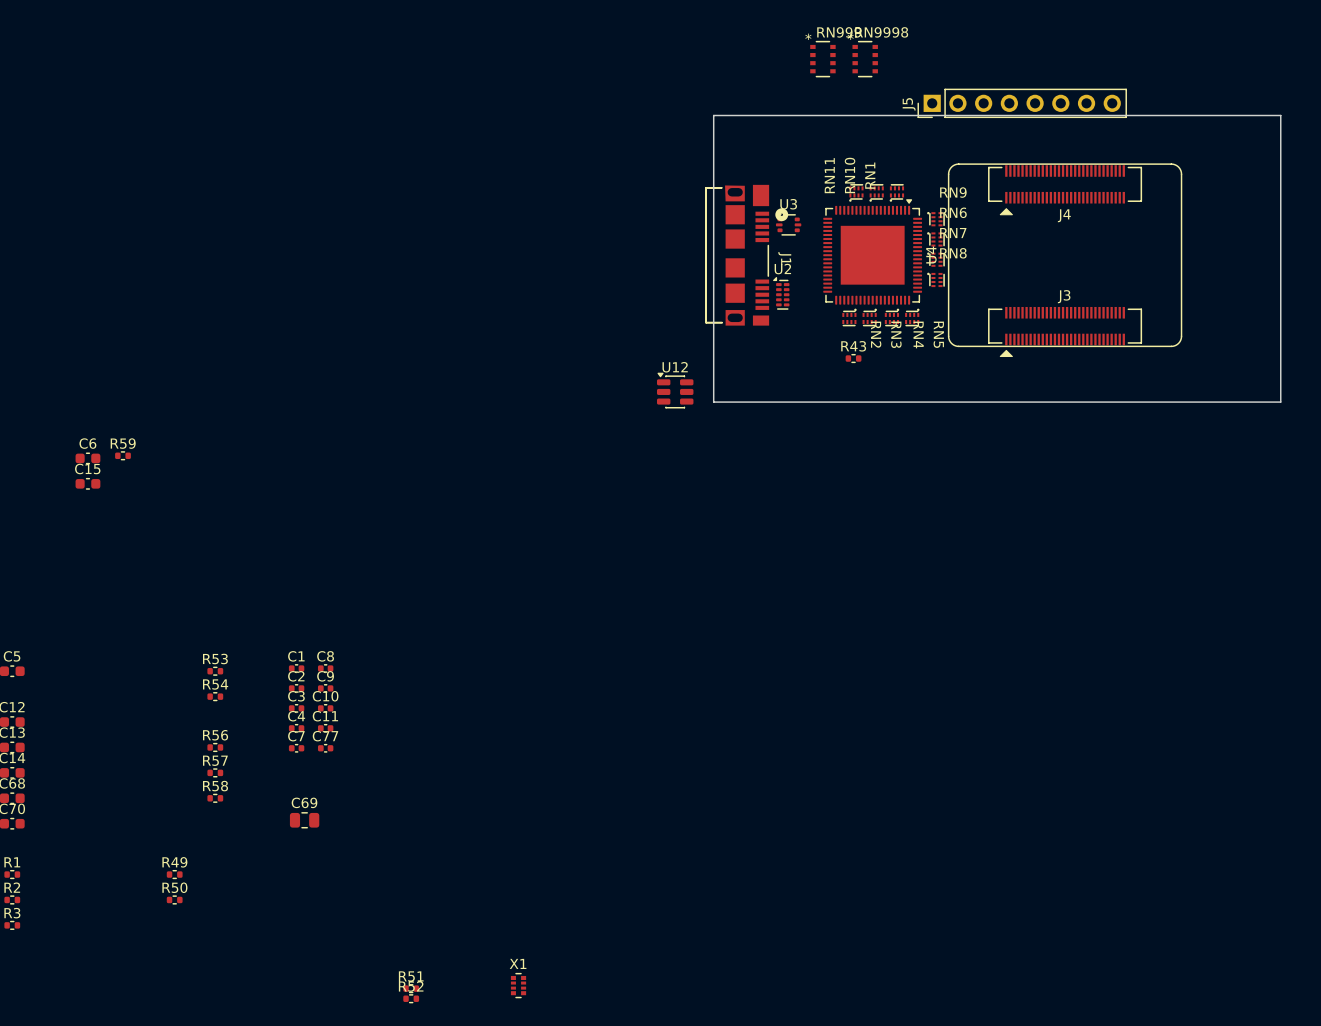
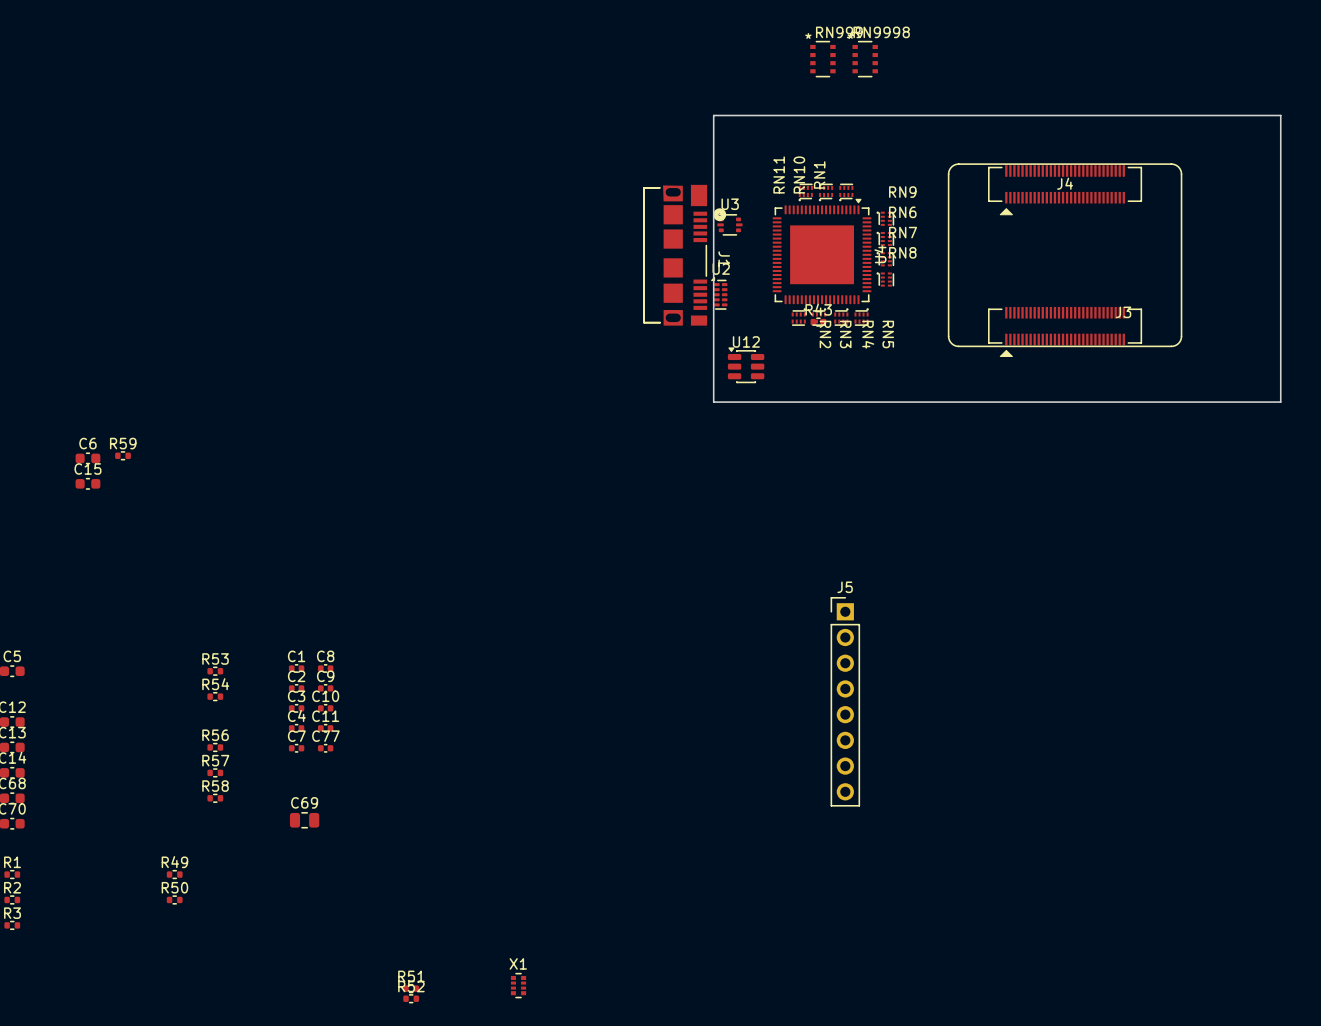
J5 rotation: 0° (1022, 103) -> 90° clockwise (845, 701)
J5 position: (1022, 103) -> (845, 701)
RN11 position: (856, 192) -> (805, 192)
RN10 position: (876, 192) -> (825, 192)
RN1 position: (896, 192) -> (846, 192)
J4 name position: J4 (1064, 215) -> J4 (1065, 183)
RN9 position: (935, 219) -> (885, 218)
U3 position: (788, 223) -> (729, 223)
RN6 position: (935, 239) -> (885, 238)
U4 position: (872, 251) -> (822, 251)
J1 position: (746, 255) -> (684, 255)
RN7 position: (935, 259) -> (885, 259)
RN8 position: (935, 279) -> (885, 279)
U2 position: (781, 293) -> (719, 293)
J3 name position: J3 (1064, 296) -> J3 (1123, 312)
RN2 position: (849, 317) -> (798, 317)
RN3 position: (869, 317) -> (819, 317)
RN4 position: (892, 317) -> (841, 317)
RN5 position: (912, 317) -> (861, 317)
R43 position: (853, 358) -> (818, 322)
U12 position: (675, 390) -> (746, 365)

